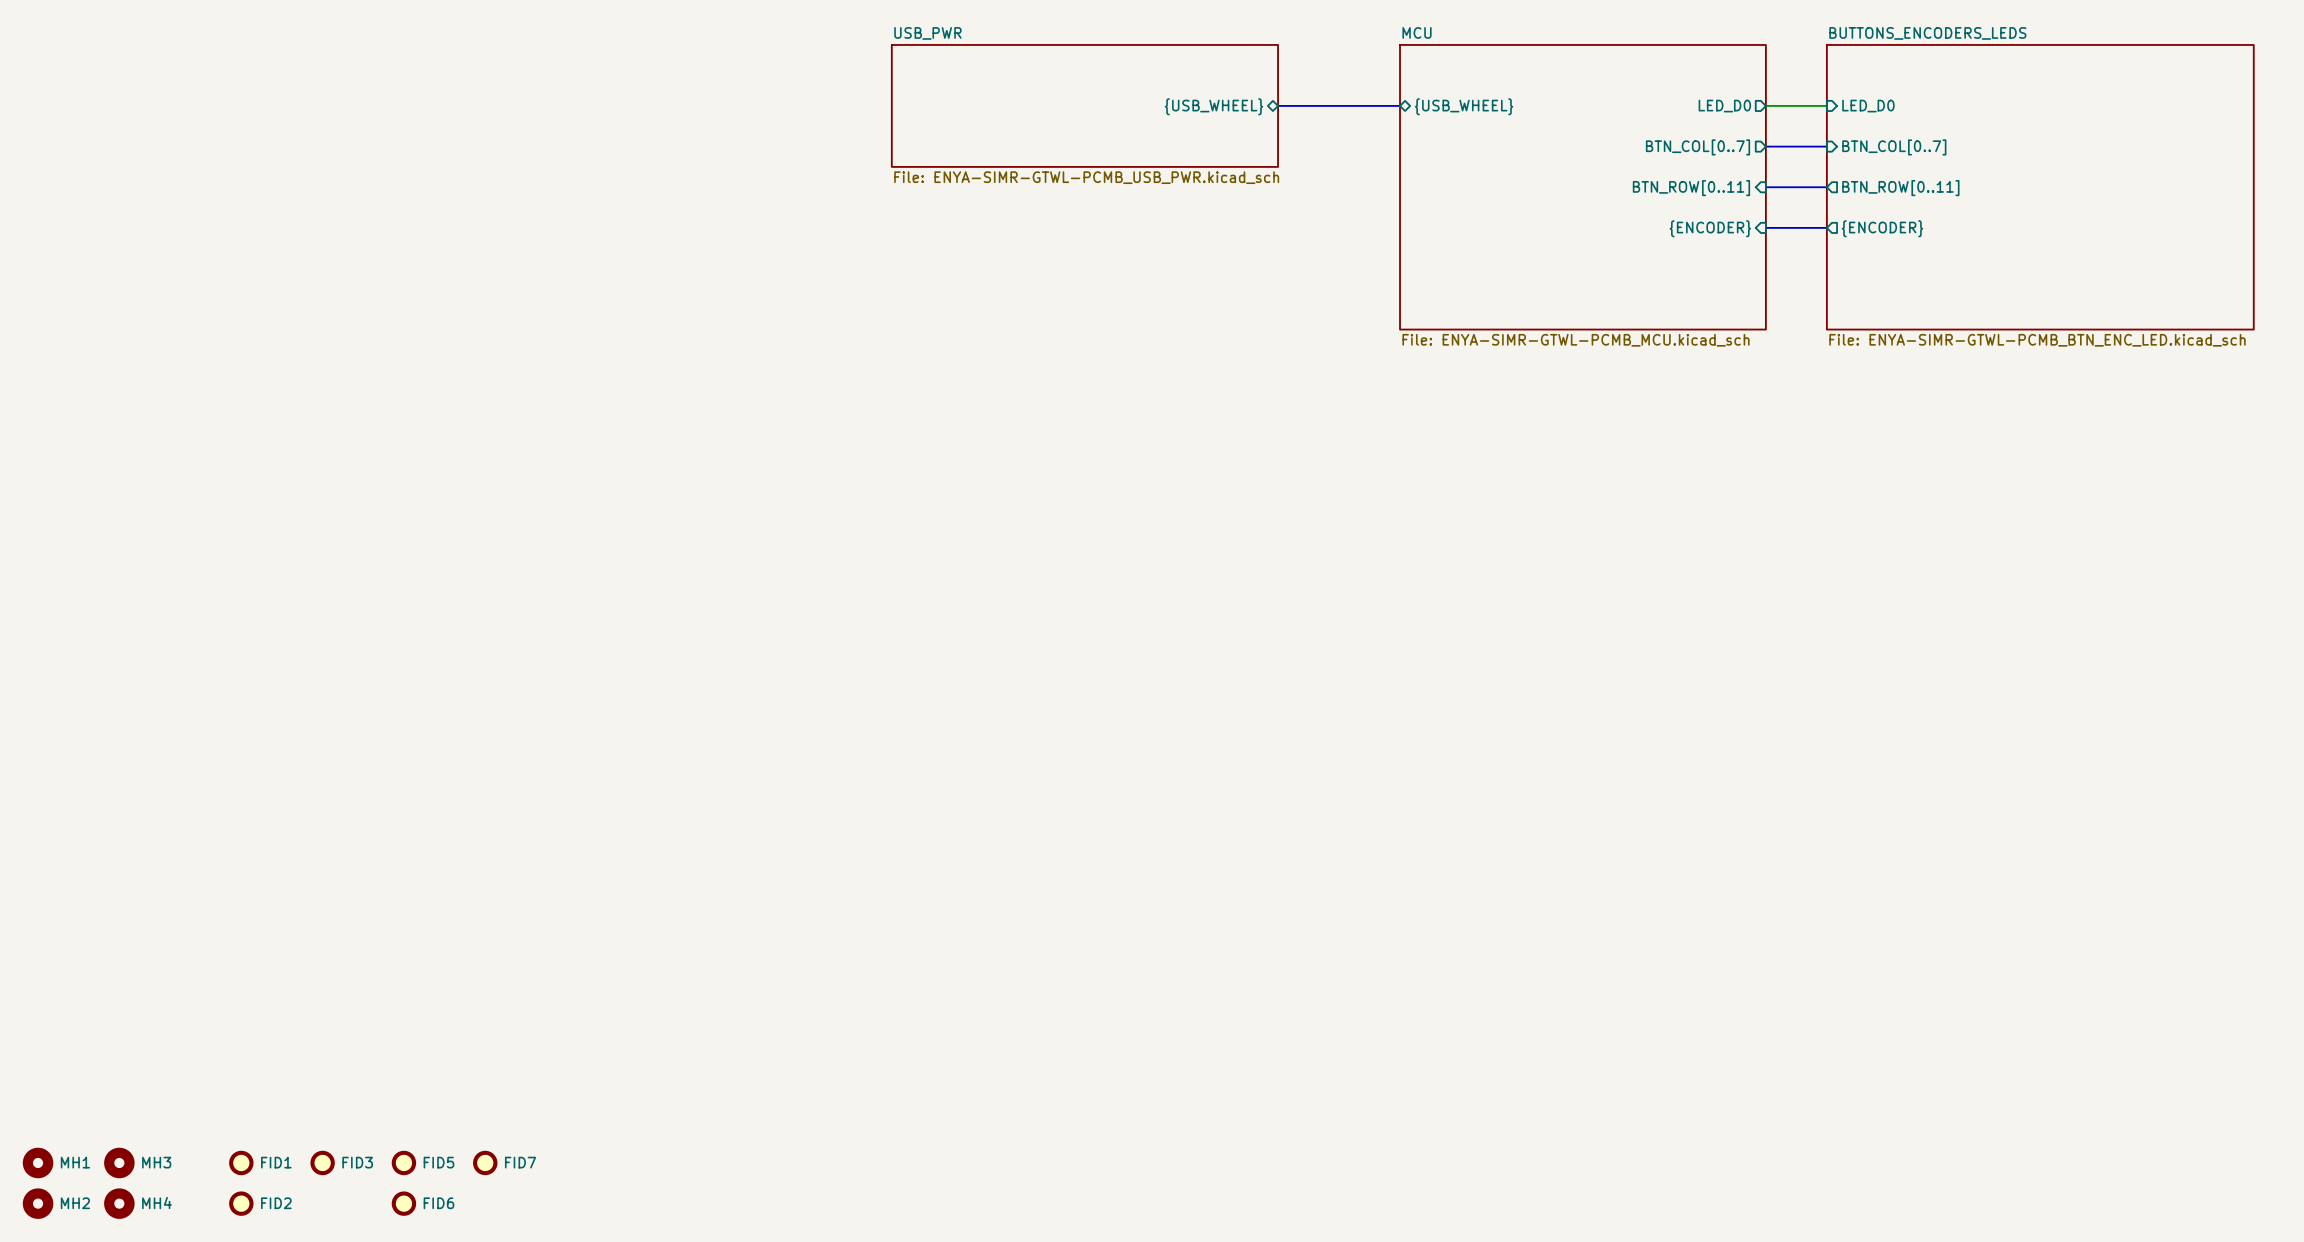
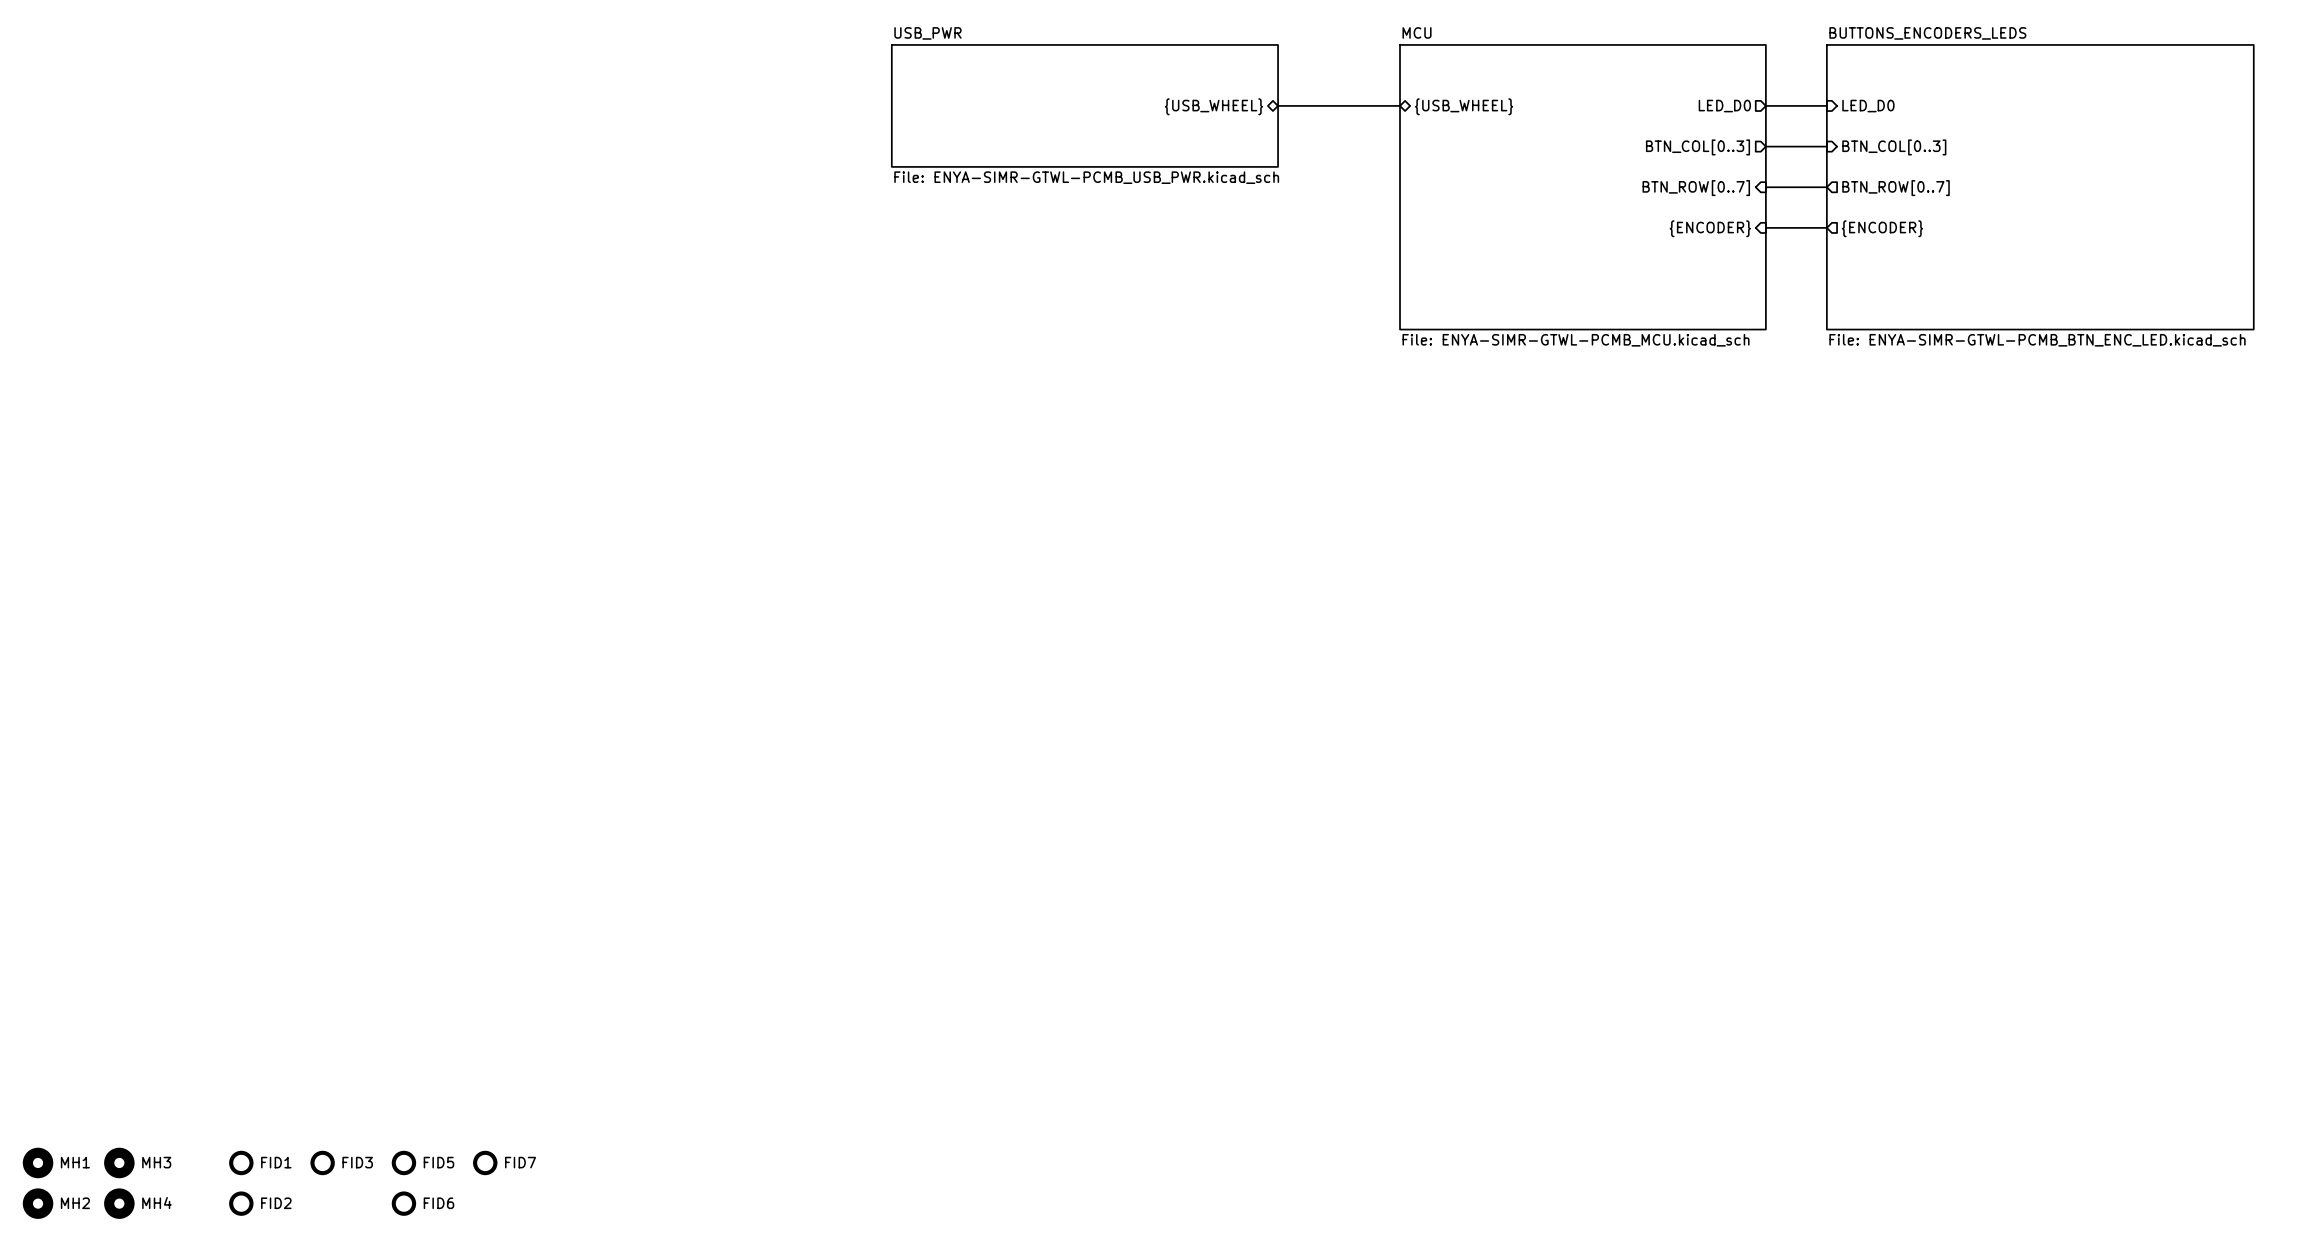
sheet pin: BTN_COL[0..7] (1697, 147) -> BTN_COL[0..3] (1697, 147)
sheet pin: BTN_COL[0..7] (1894, 147) -> BTN_COL[0..3] (1894, 147)
sheet pin: BTN_ROW[0..11] (1691, 188) -> BTN_ROW[0..7] (1696, 188)
sheet pin: BTN_ROW[0..11] (1900, 188) -> BTN_ROW[0..7] (1896, 188)

